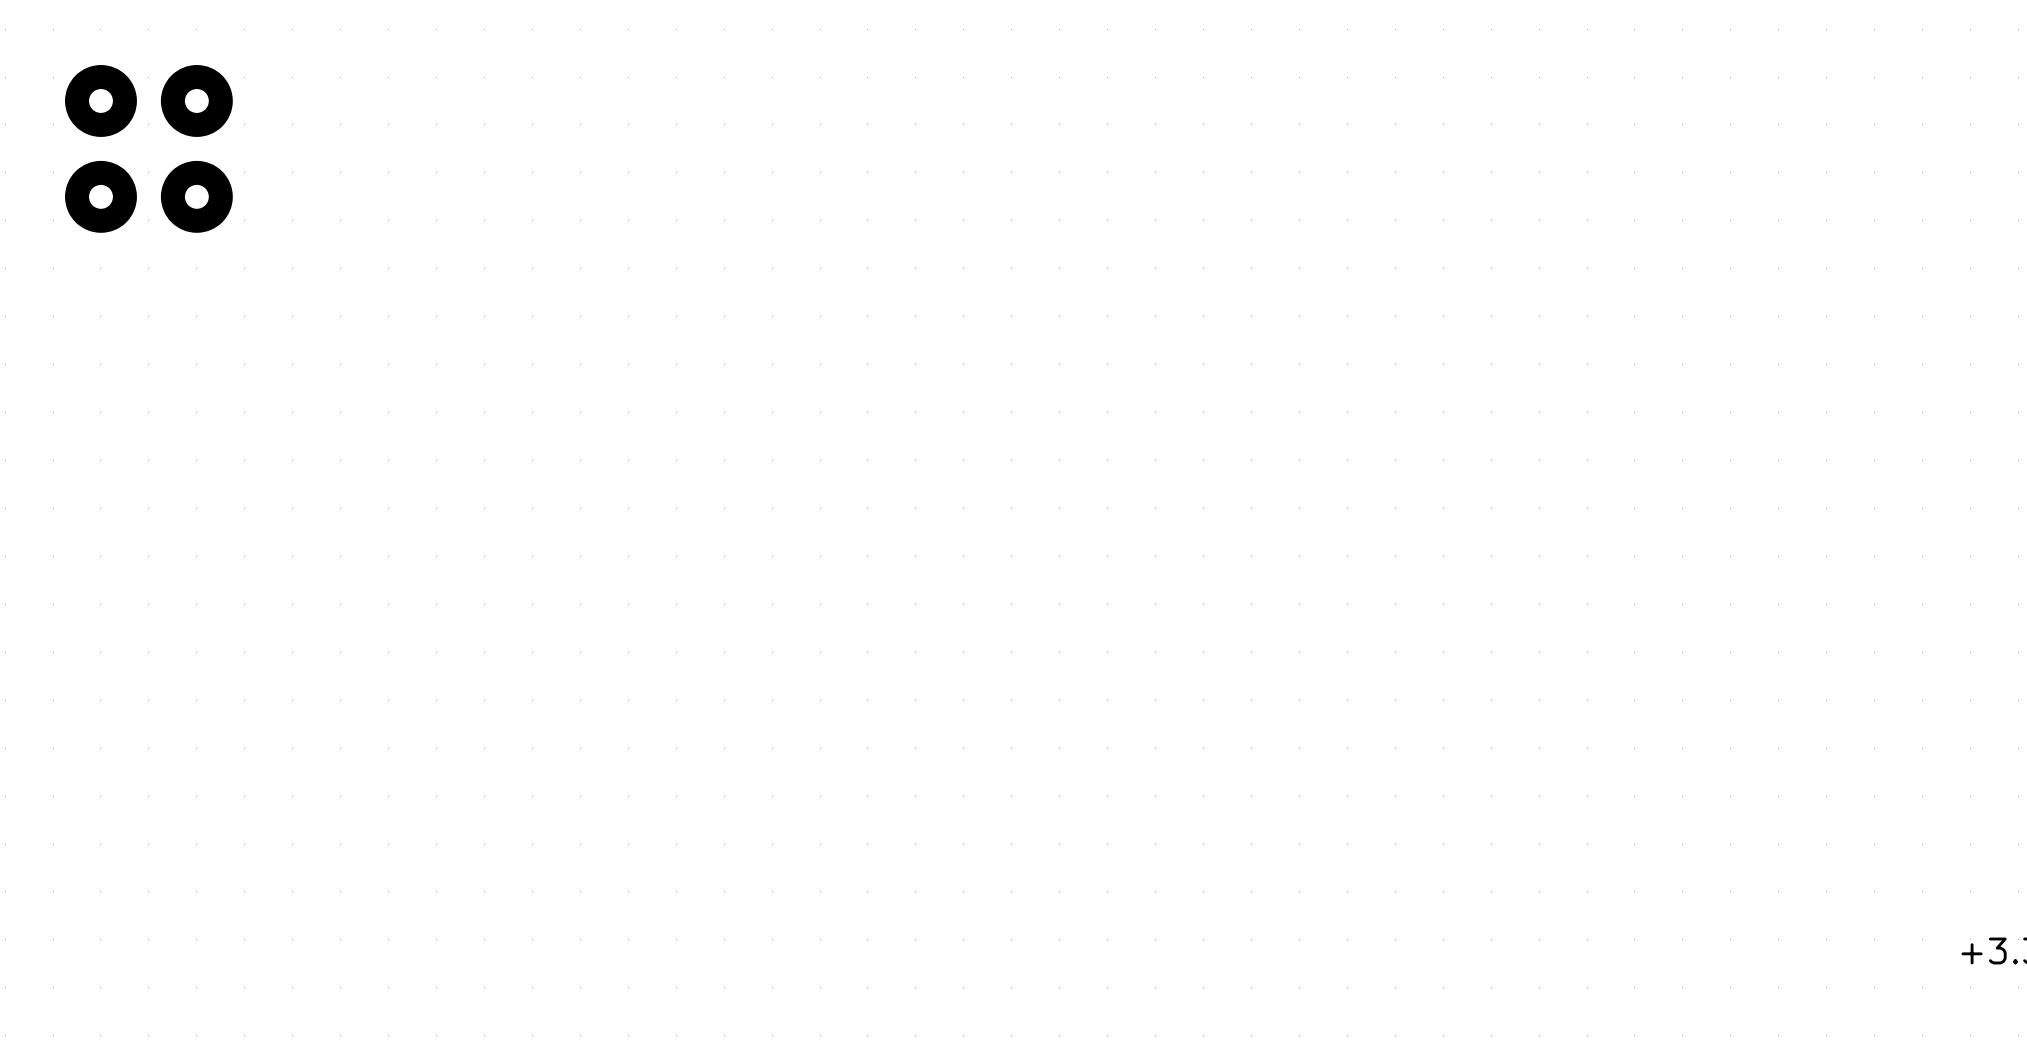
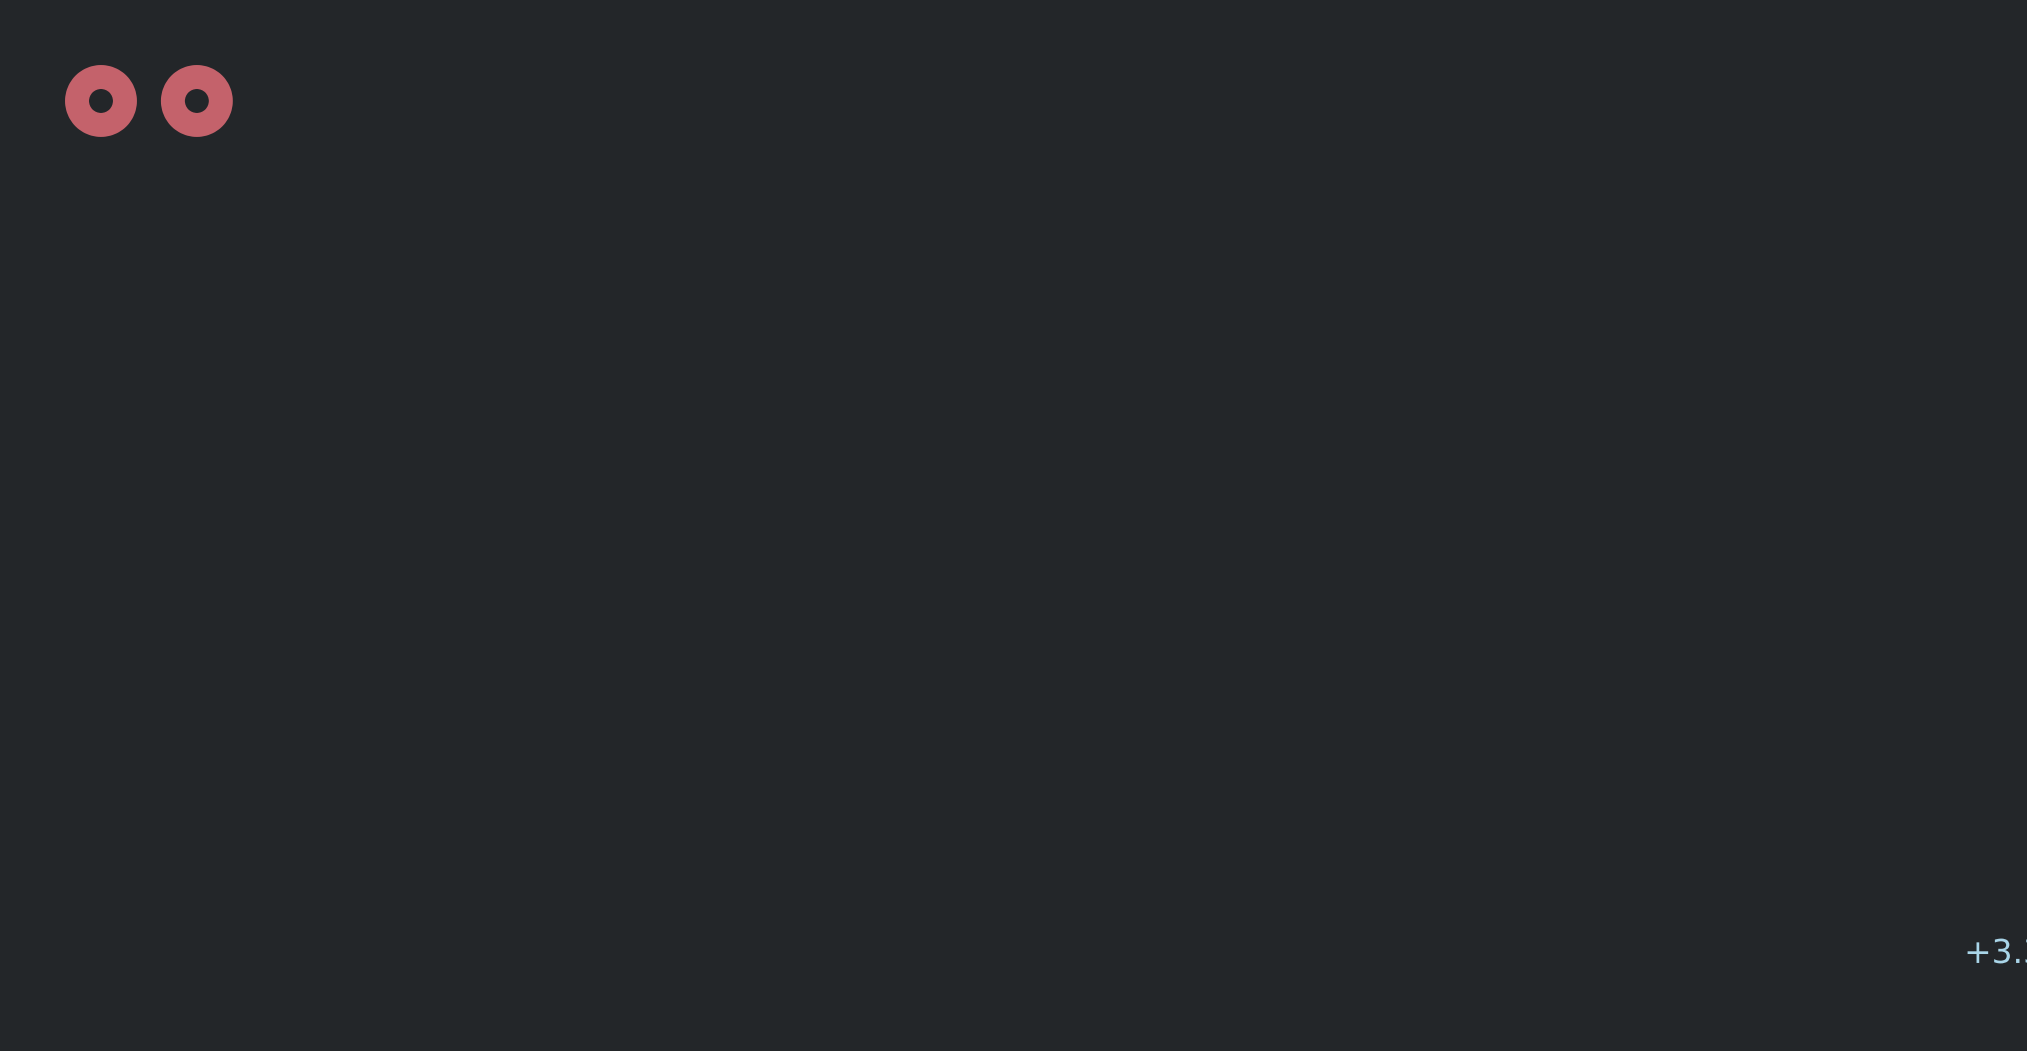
part: (100, 196) -> none
part: (196, 196) -> none

